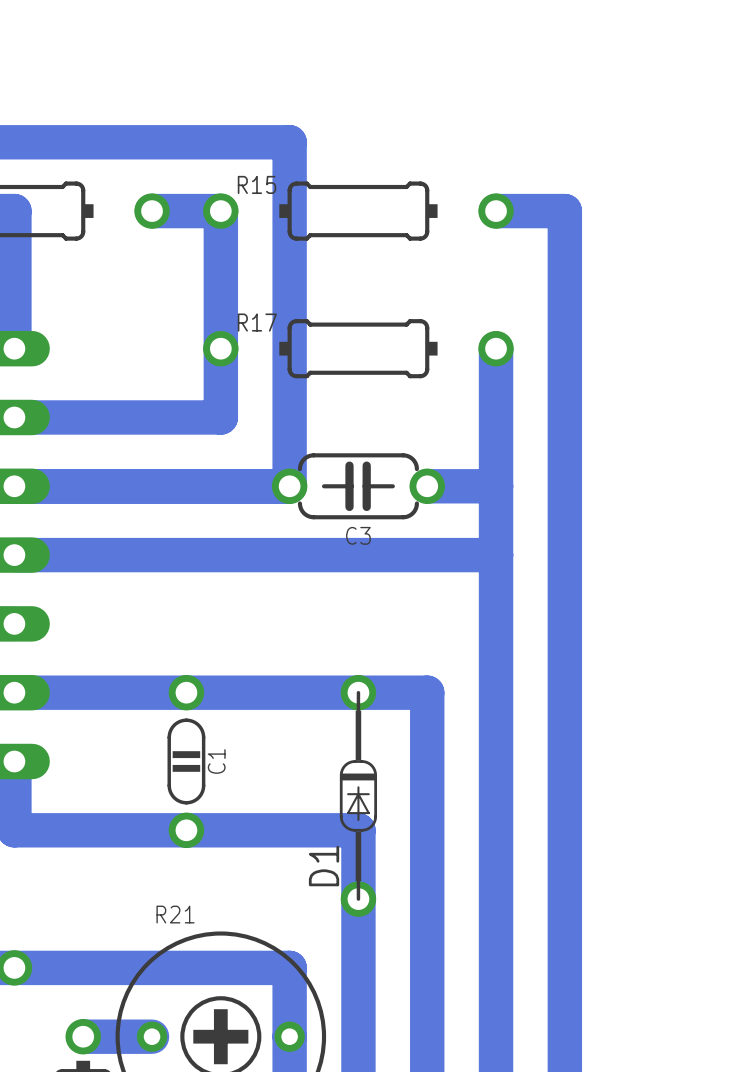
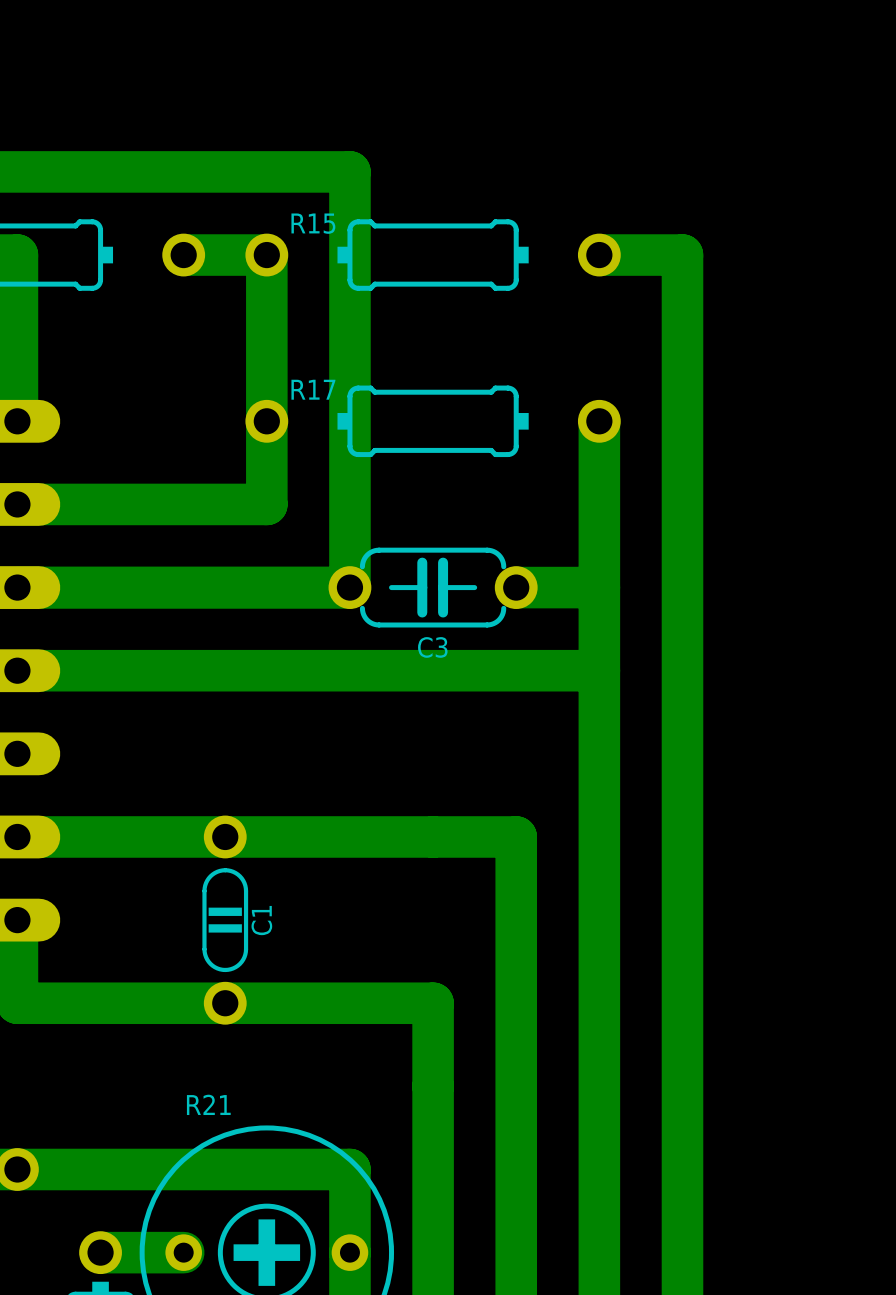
D1: (358, 795) -> none

